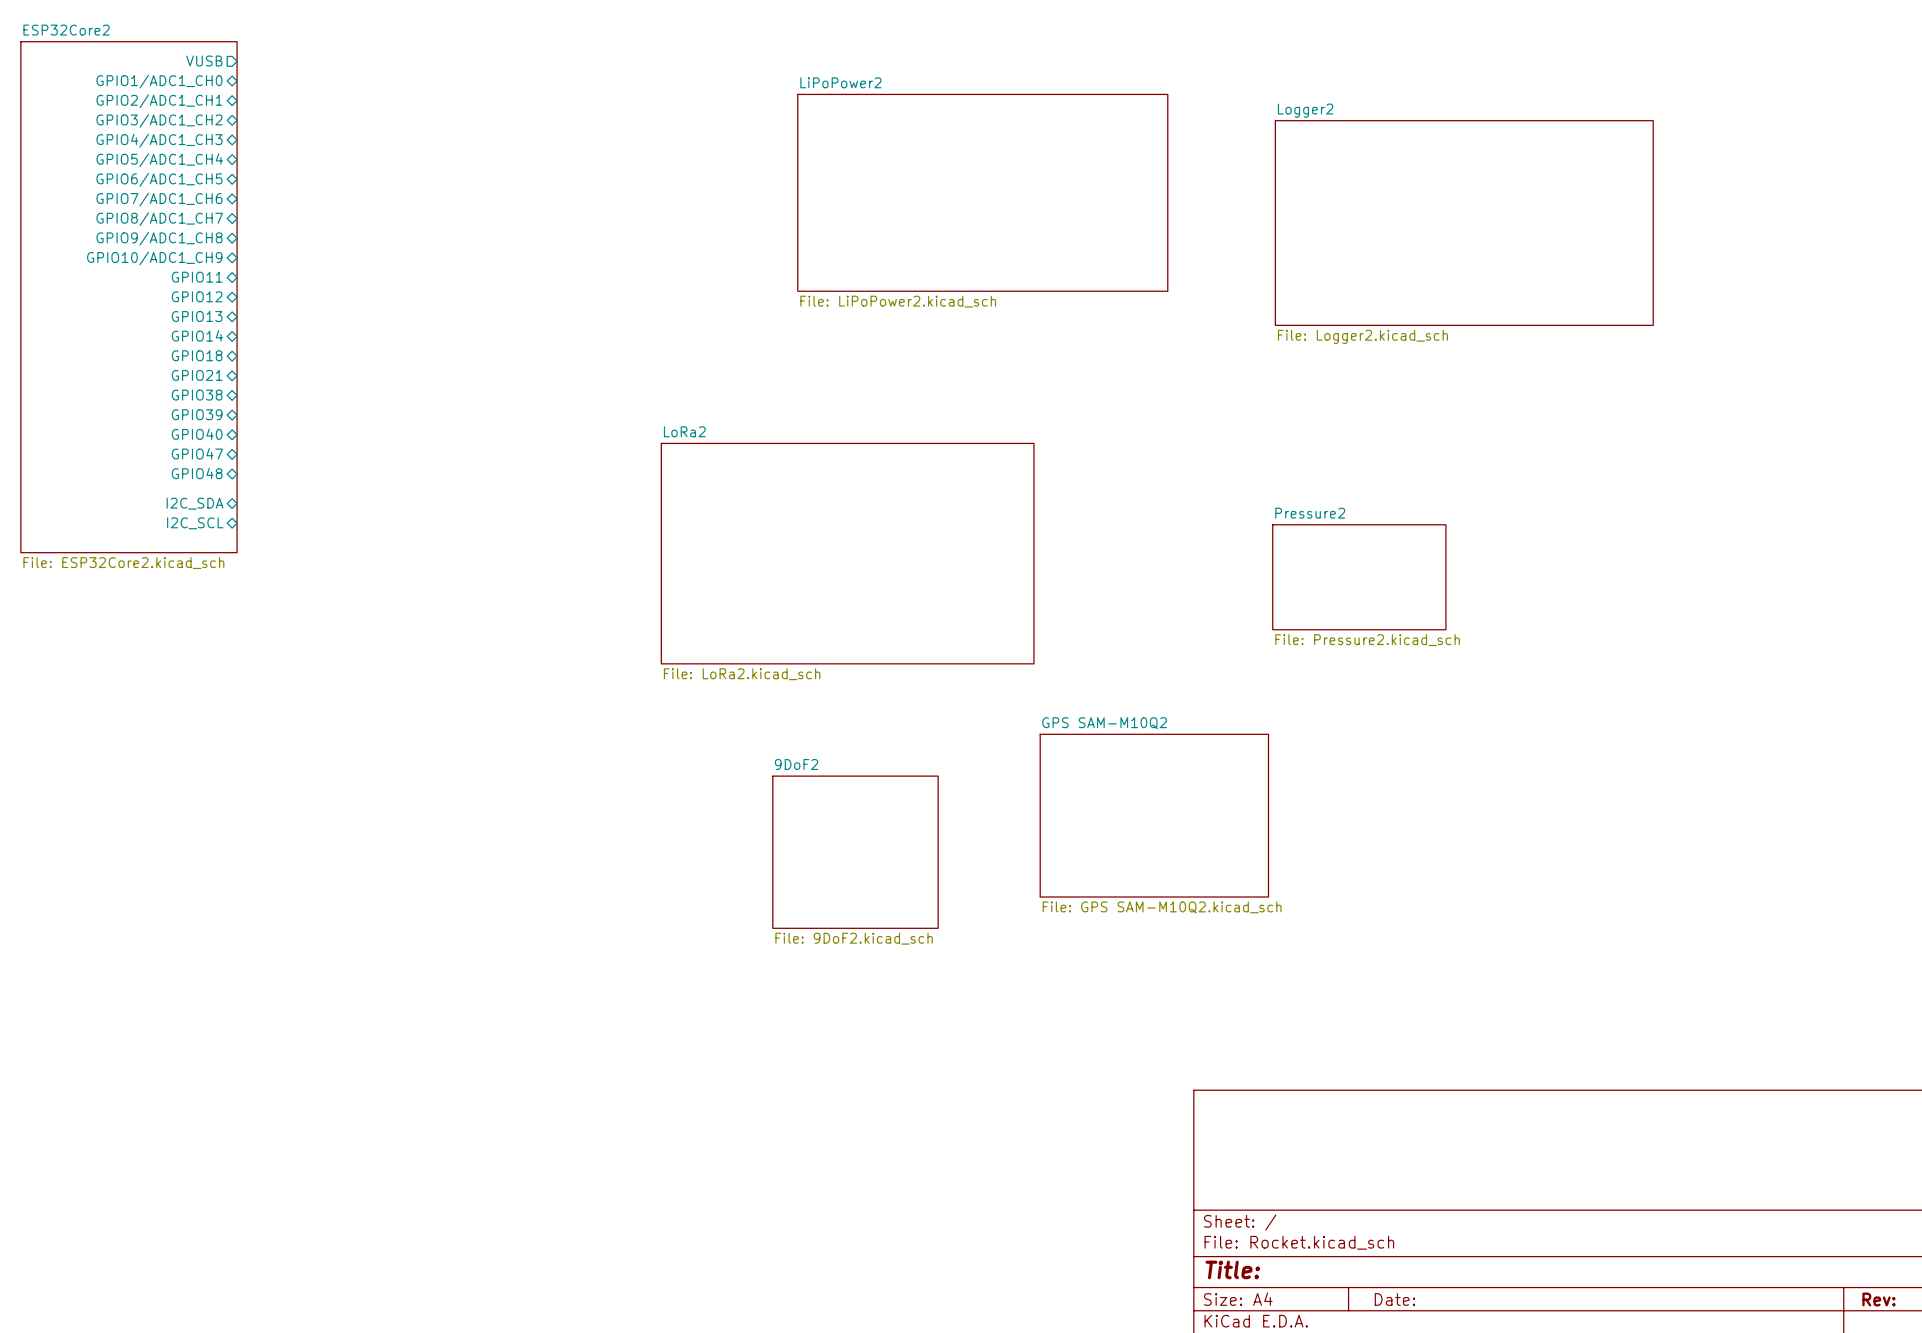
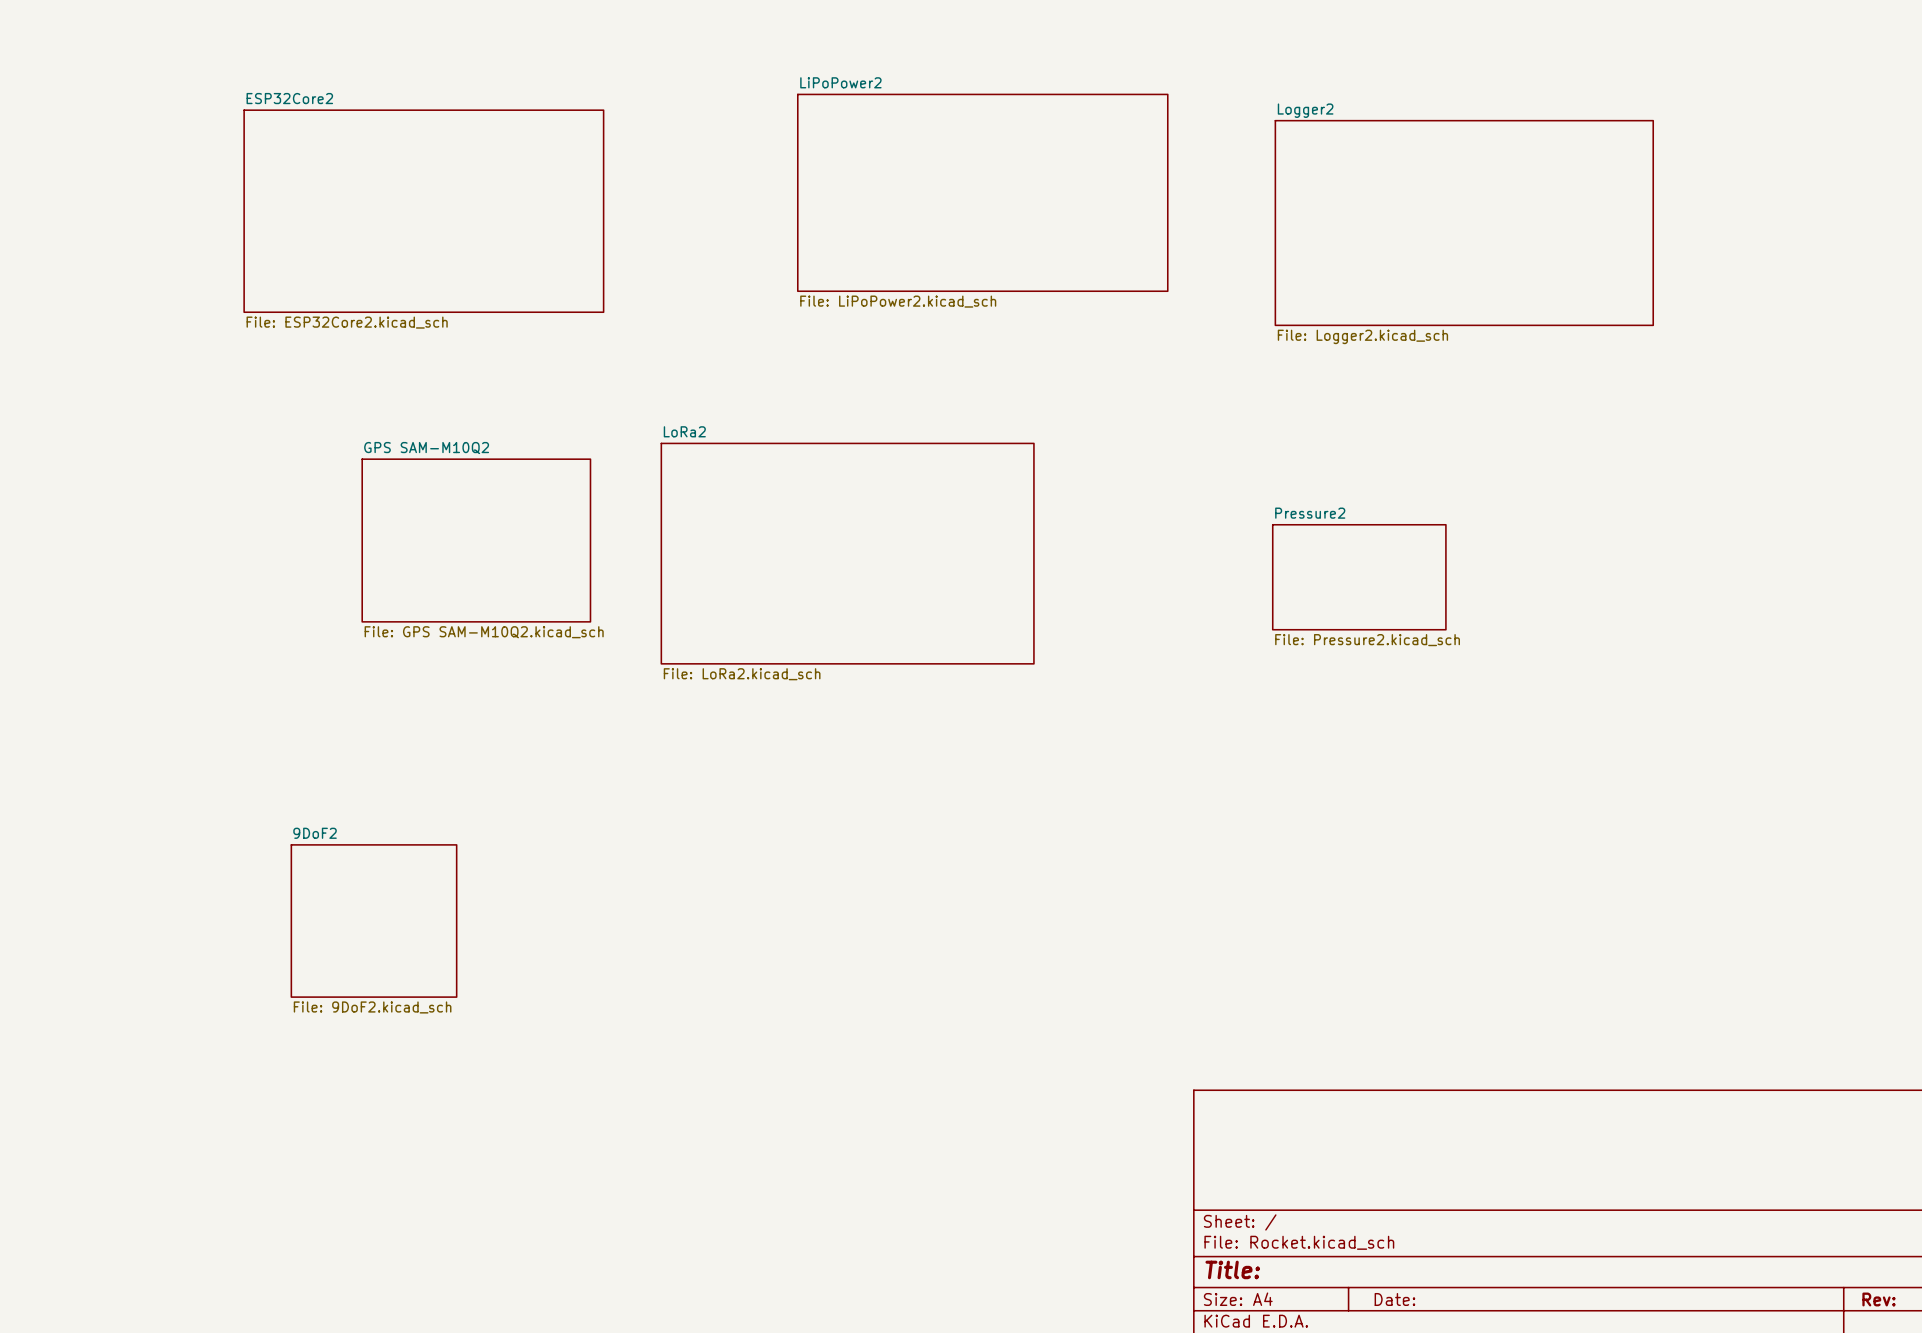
sheet ESP32Core2 name position: ESP32Core2 (66, 30) -> ESP32Core2 (289, 98)
sheet ESP32Core2 shape: [20, 41, 238, 554] -> [243, 109, 605, 313]
sheet pin: VUSB (204, 61) -> none
sheet pin: GPIO1/ADC1_CH0 (159, 81) -> none
sheet pin: GPIO2/ADC1_CH1 (159, 101) -> none
sheet pin: GPIO3/ADC1_CH2 (159, 120) -> none
sheet pin: GPIO4/ADC1_CH3 (159, 140) -> none
sheet pin: GPIO5/ADC1_CH4 (159, 160) -> none
sheet pin: GPIO6/ADC1_CH5 (159, 179) -> none
sheet pin: GPIO7/ADC1_CH6 (159, 199) -> none
sheet pin: GPIO8/ADC1_CH7 (159, 219) -> none
sheet pin: GPIO9/ADC1_CH8 (159, 238) -> none
sheet pin: GPIO10/ADC1_CH9 (154, 258) -> none
sheet pin: GPIO11 (197, 277) -> none
sheet pin: GPIO12 (197, 296) -> none
sheet pin: GPIO13 (197, 316) -> none
sheet pin: GPIO14 (197, 335) -> none
sheet pin: GPIO18 (197, 355) -> none
sheet pin: GPIO21 (197, 375) -> none
sheet pin: GPIO38 (197, 395) -> none
sheet pin: GPIO39 (197, 414) -> none
sheet pin: GPIO40 (197, 434) -> none
sheet pin: GPIO47 (197, 453) -> none
sheet pin: GPIO48 (197, 473) -> none
sheet pin: I2C_SDA (195, 503) -> none
sheet pin: I2C_SCL (195, 523) -> none
sheet ESP32Core2 value position: File: ESP32Core2.kicad_sch (123, 563) -> File: ESP32Core2.kicad_sch (347, 322)
sheet GPS SAM-M10Q2 position: (1154, 815) -> (476, 540)
sheet 9DoF2 position: (855, 852) -> (374, 921)

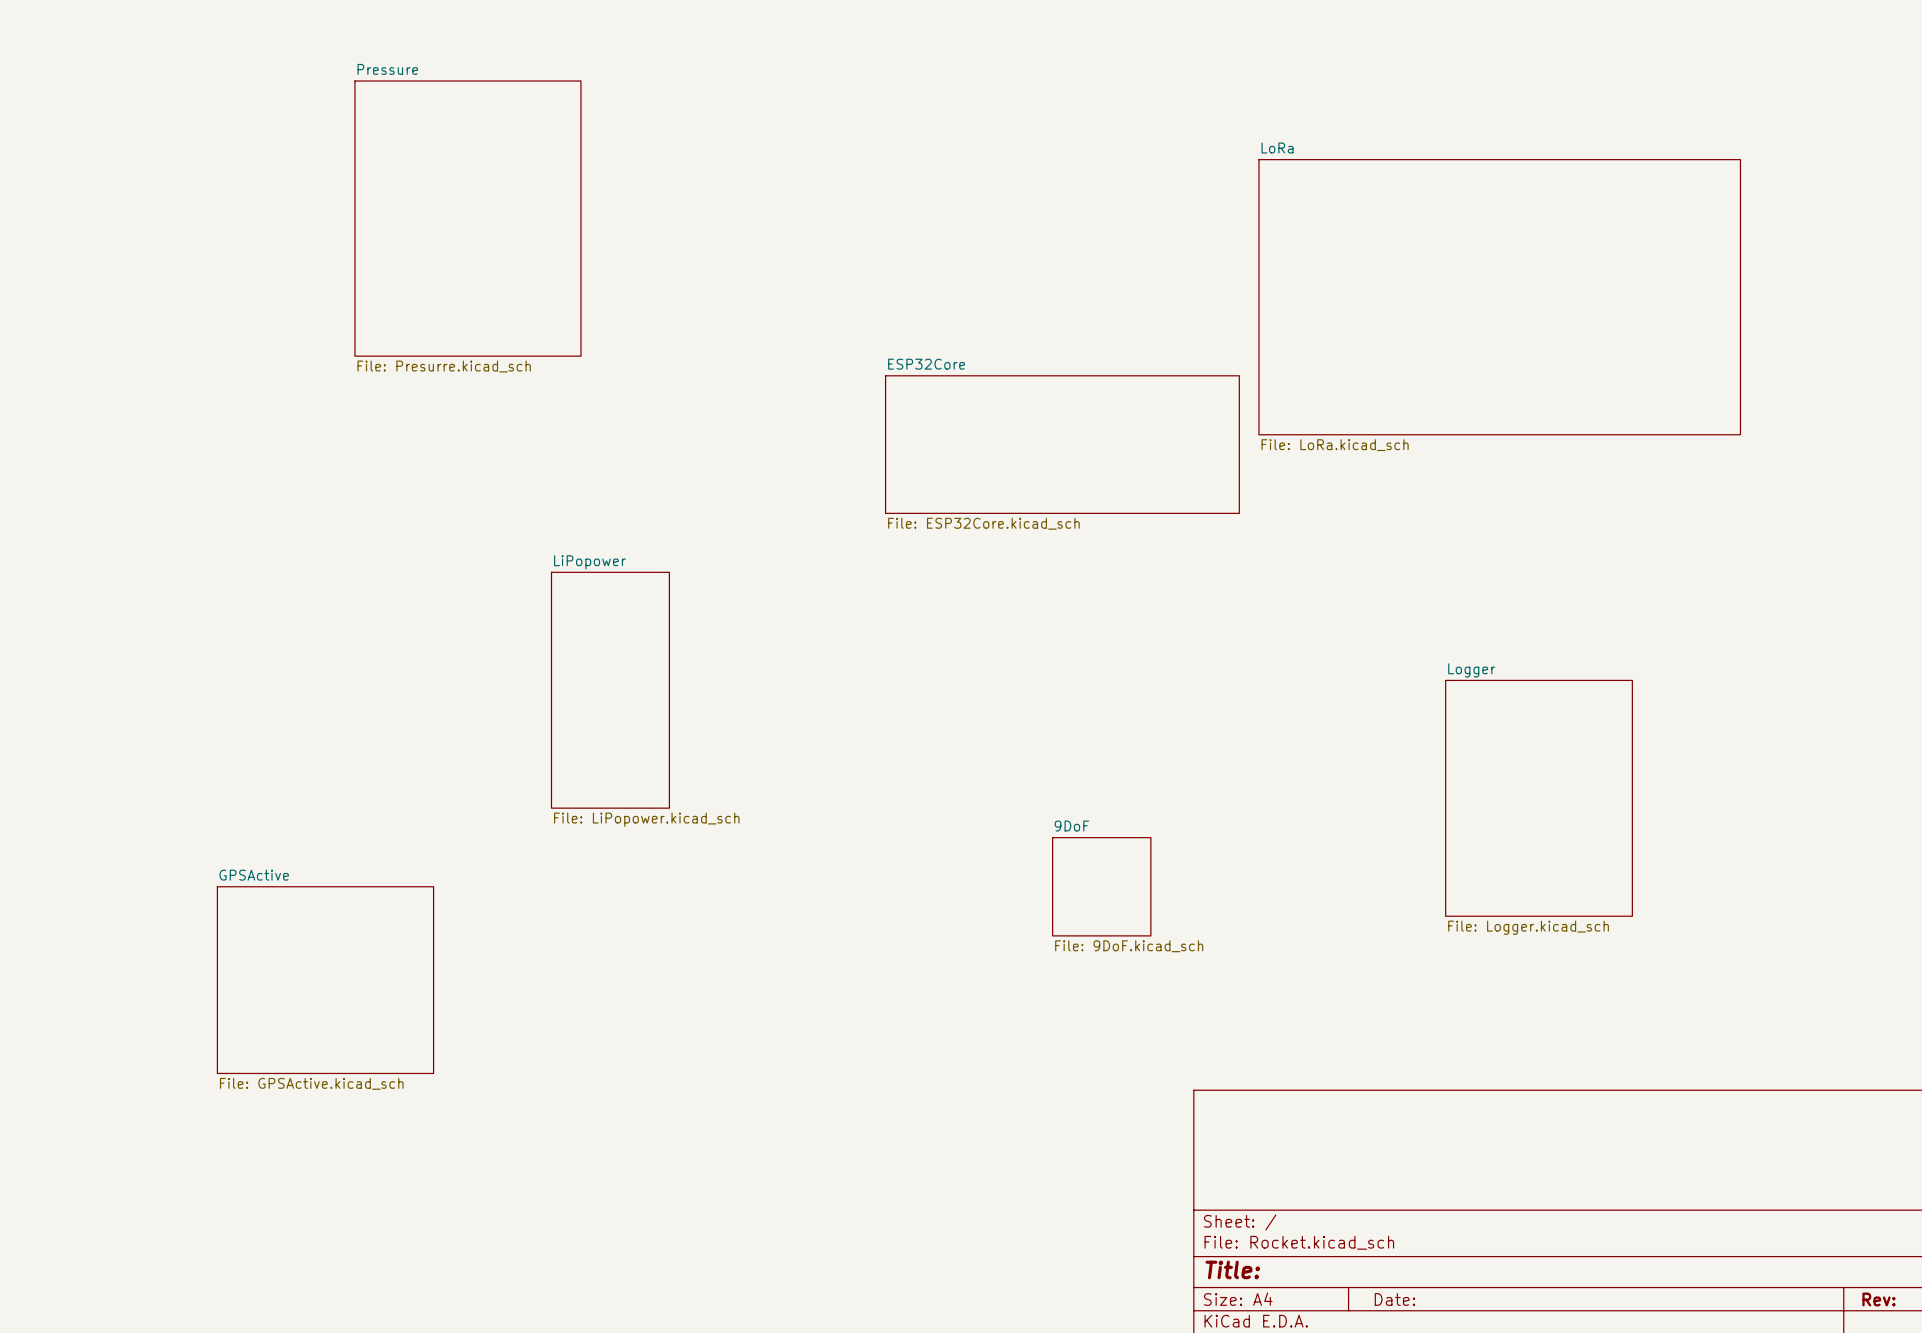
sheet LiPoPower2: File: LiPoPower2.kicad_sch (982, 192) -> none
sheet ESP32Core2: File: ESP32Core2.kicad_sch (423, 211) -> none
sheet Pressure: none -> File: Presurre.kicad_sch (467, 218)
sheet Logger2: File: Logger2.kicad_sch (1464, 223) -> none
sheet LoRa: none -> File: LoRa.kicad_sch (1499, 297)
sheet ESP32Core: none -> File: ESP32Core.kicad_sch (1062, 444)
sheet GPS SAM-M10Q2: File: GPS SAM-M10Q2.kicad_sch (476, 540) -> none
sheet LoRa2: File: LoRa2.kicad_sch (847, 553) -> none
sheet Pressure2: File: Pressure2.kicad_sch (1359, 577) -> none
sheet LiPopower: none -> File: LiPopower.kicad_sch (610, 690)
sheet Logger: none -> File: Logger.kicad_sch (1539, 798)
sheet 9DoF: none -> File: 9DoF.kicad_sch (1101, 886)
sheet 9DoF2: File: 9DoF2.kicad_sch (374, 921) -> none
sheet GPSActive: none -> File: GPSActive.kicad_sch (325, 980)

